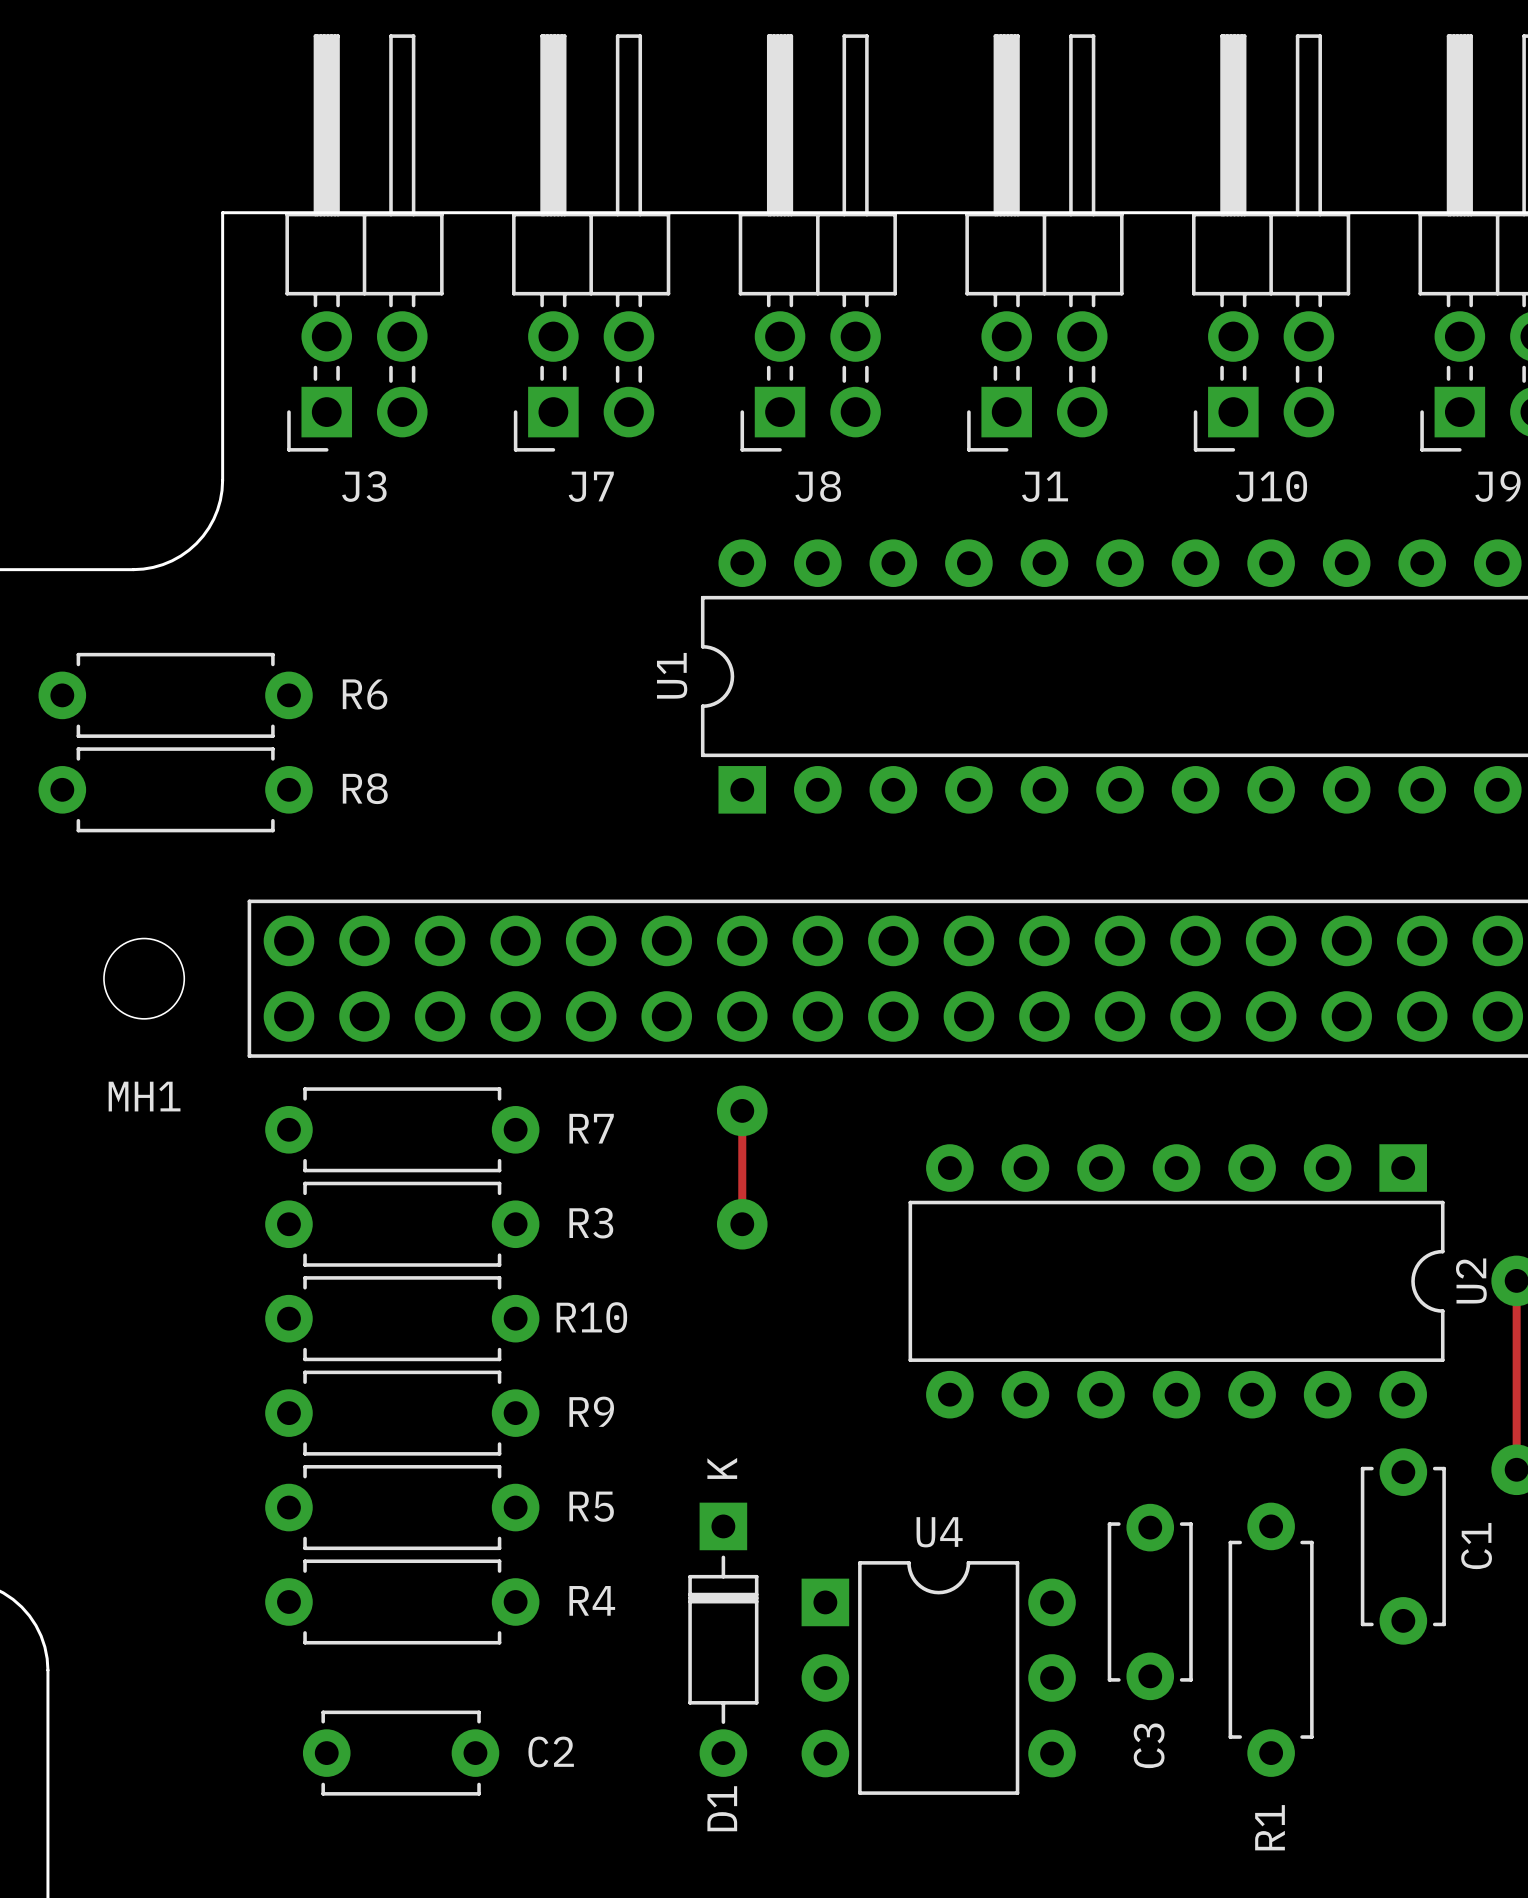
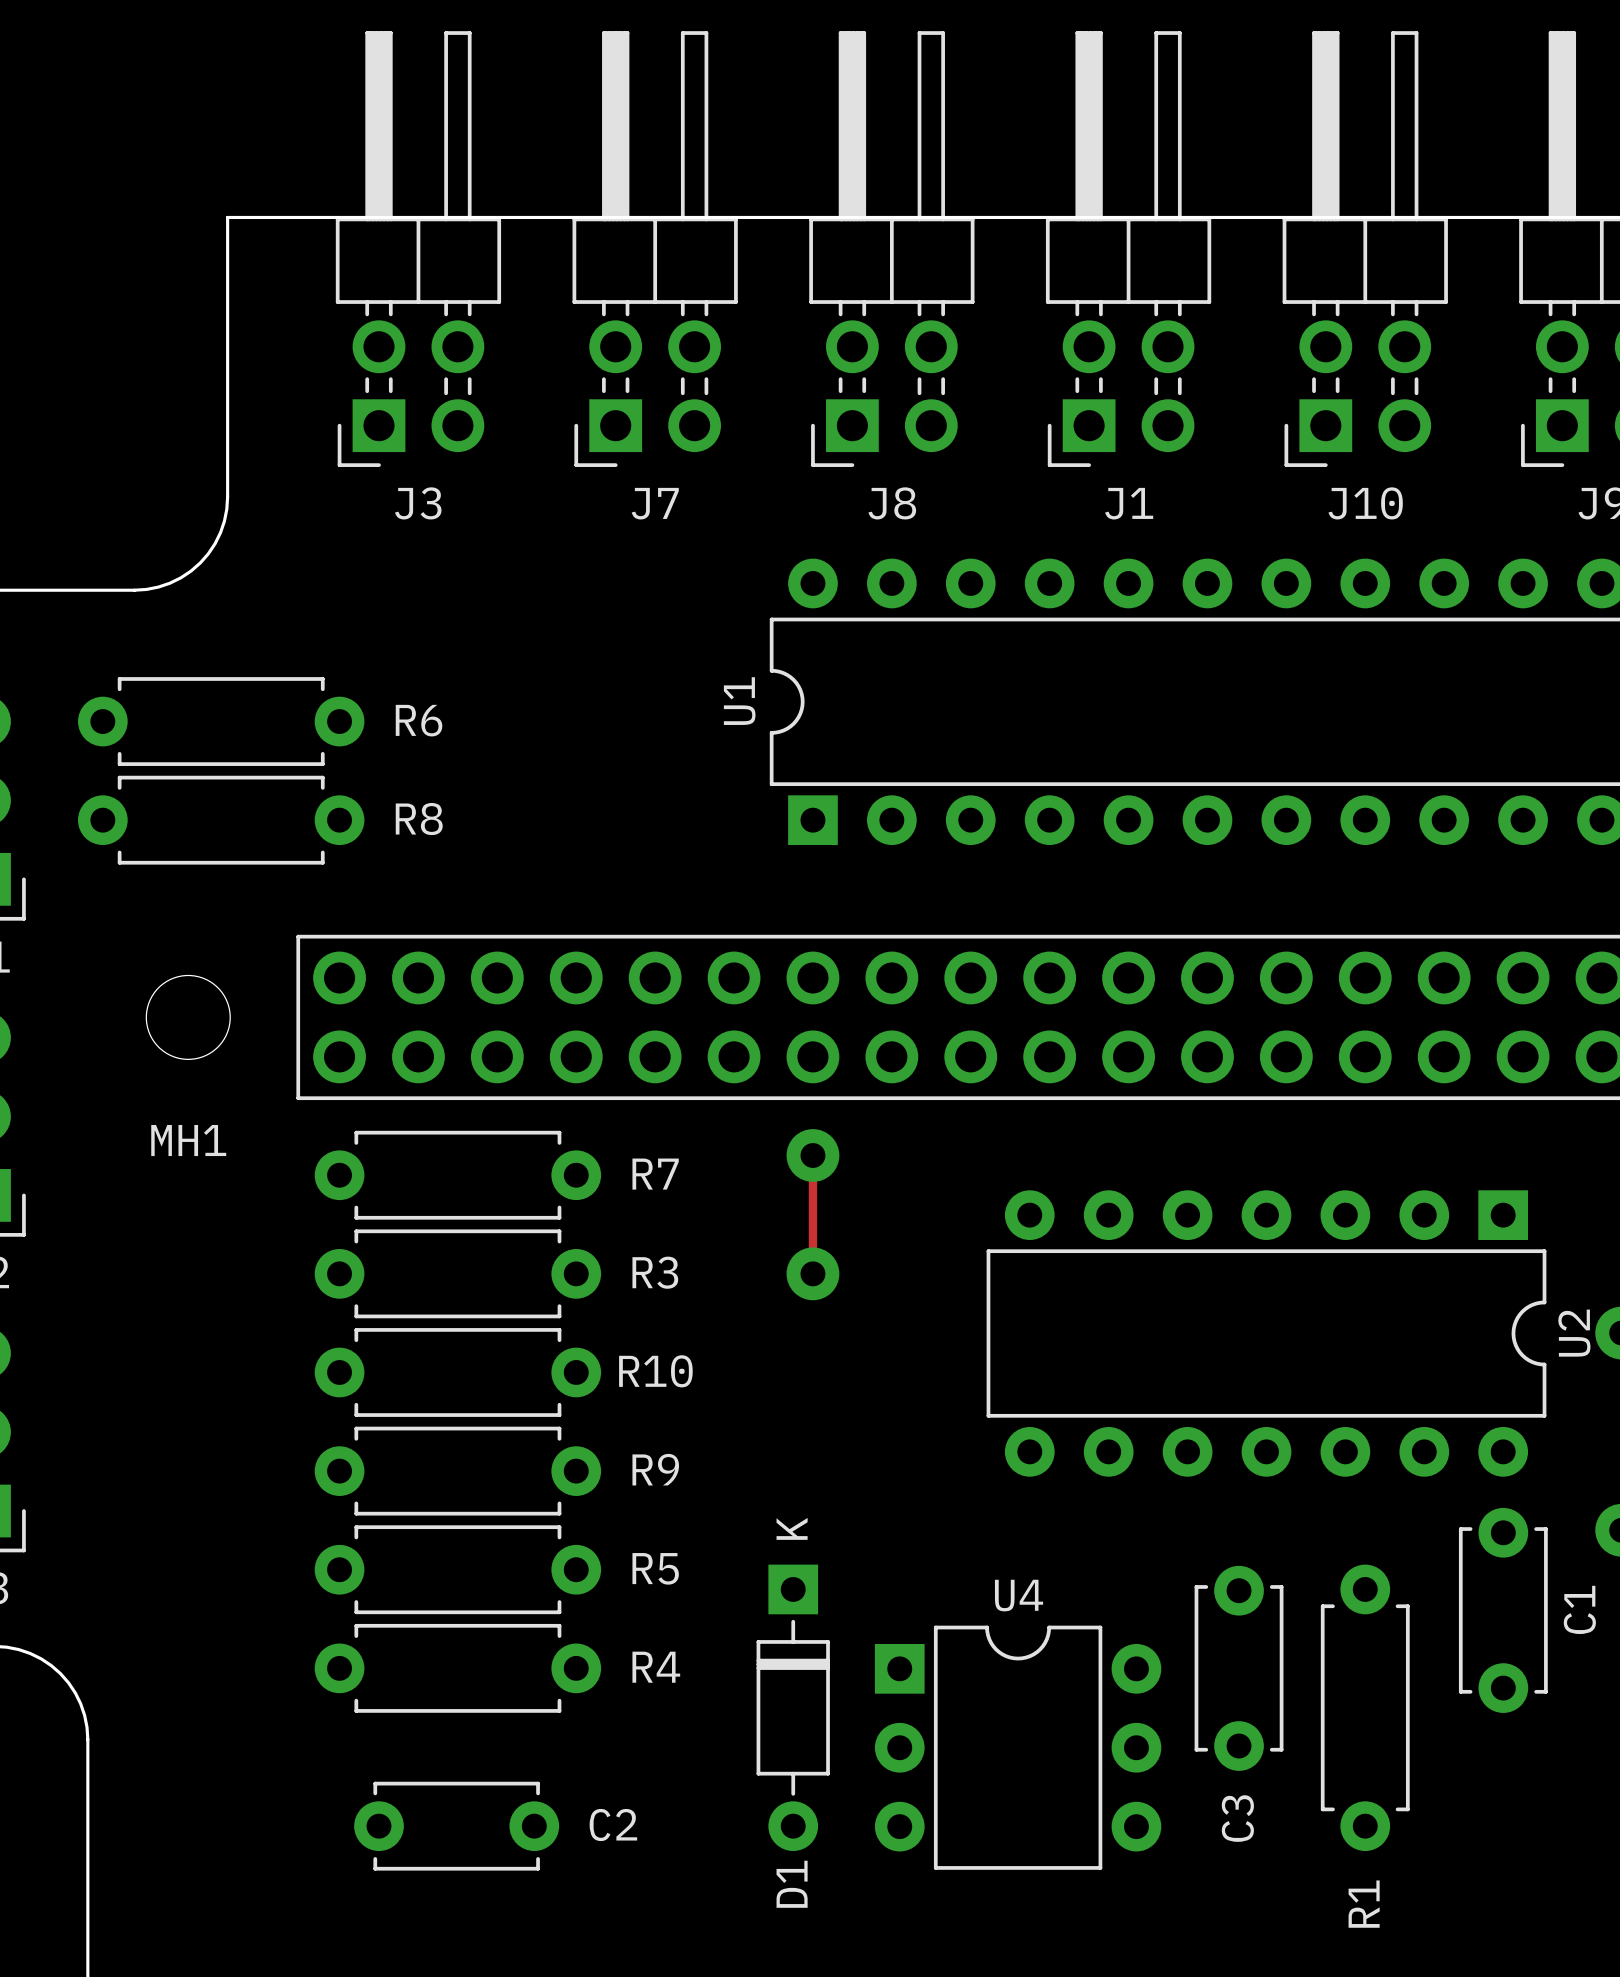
board edge: (222, 212) (222, 480) (217, 509) (203, 536) (189, 550) (172, 560) (143, 569) (92, 569) -> (270, 217) (227, 217) (227, 497) (226, 509) (220, 532) (208, 553) (191, 570) (170, 583) (158, 587) (134, 590)

